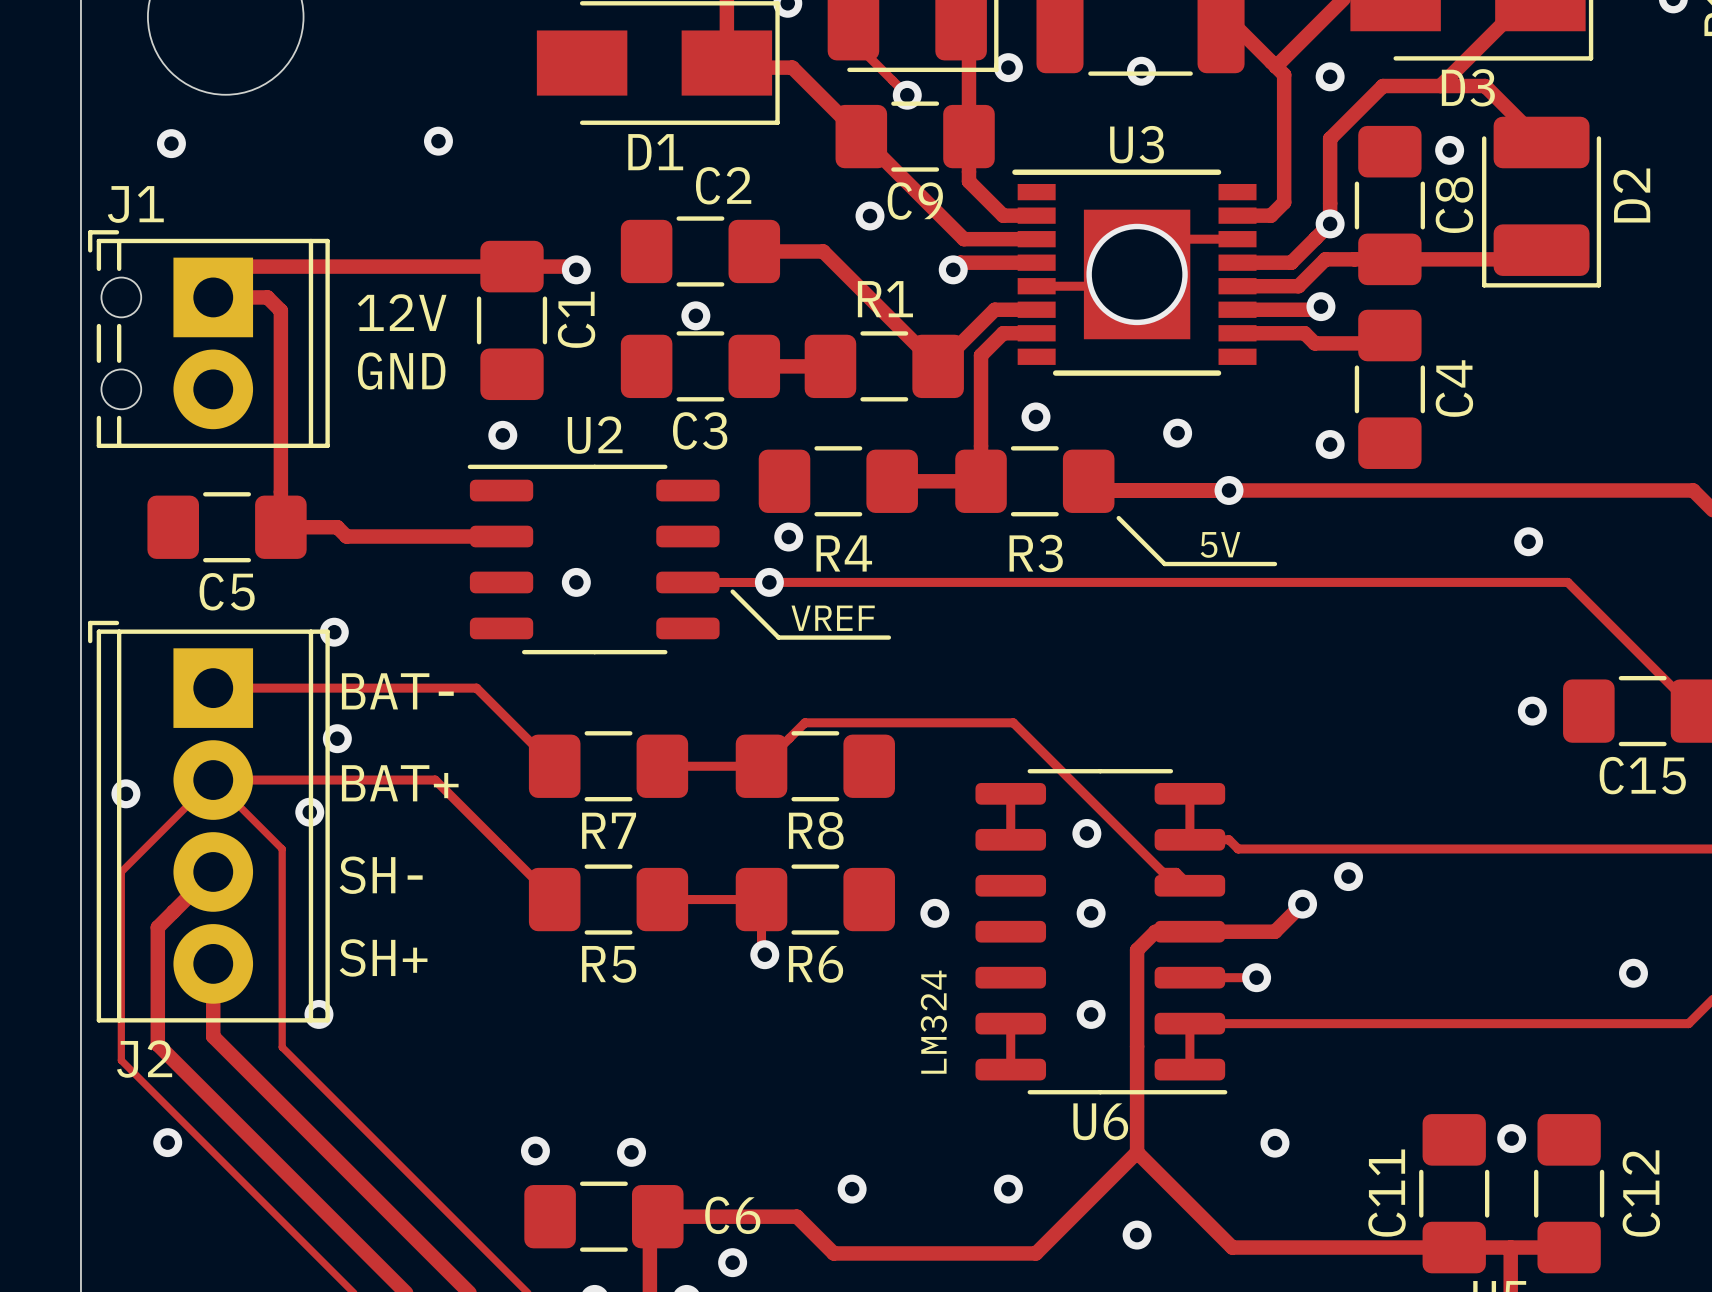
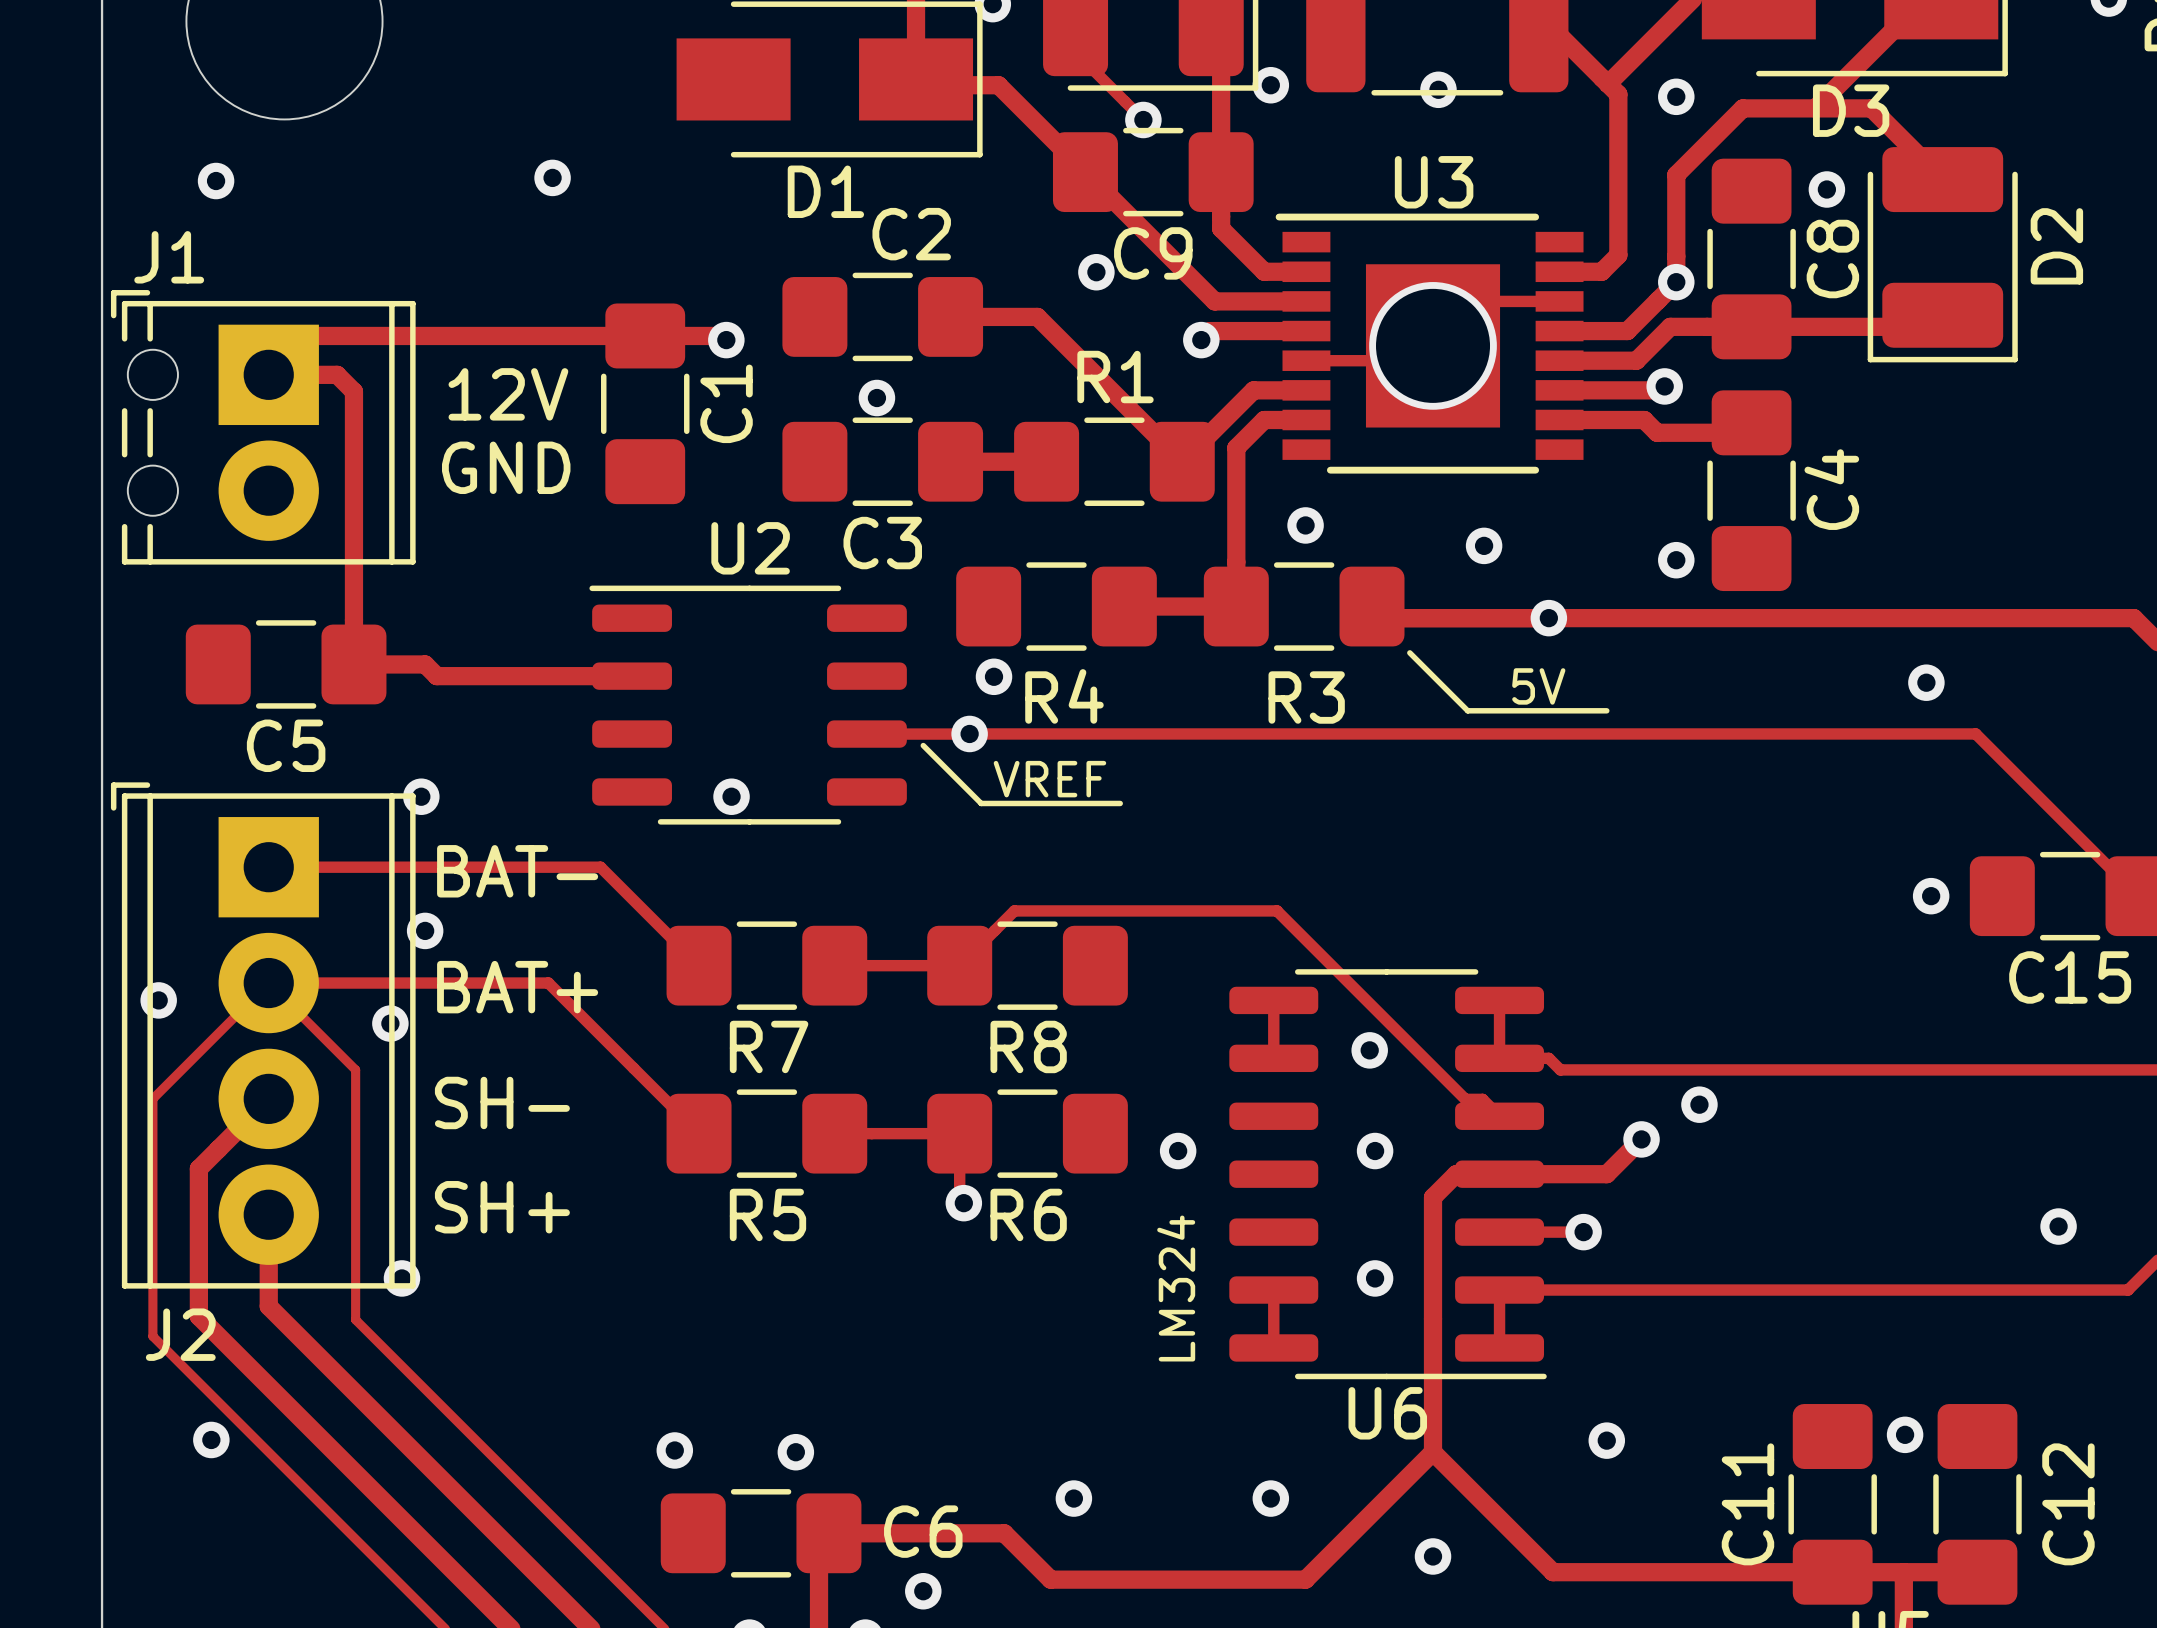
via: (502, 435) -> none
via position: (576, 582) -> (731, 796)

